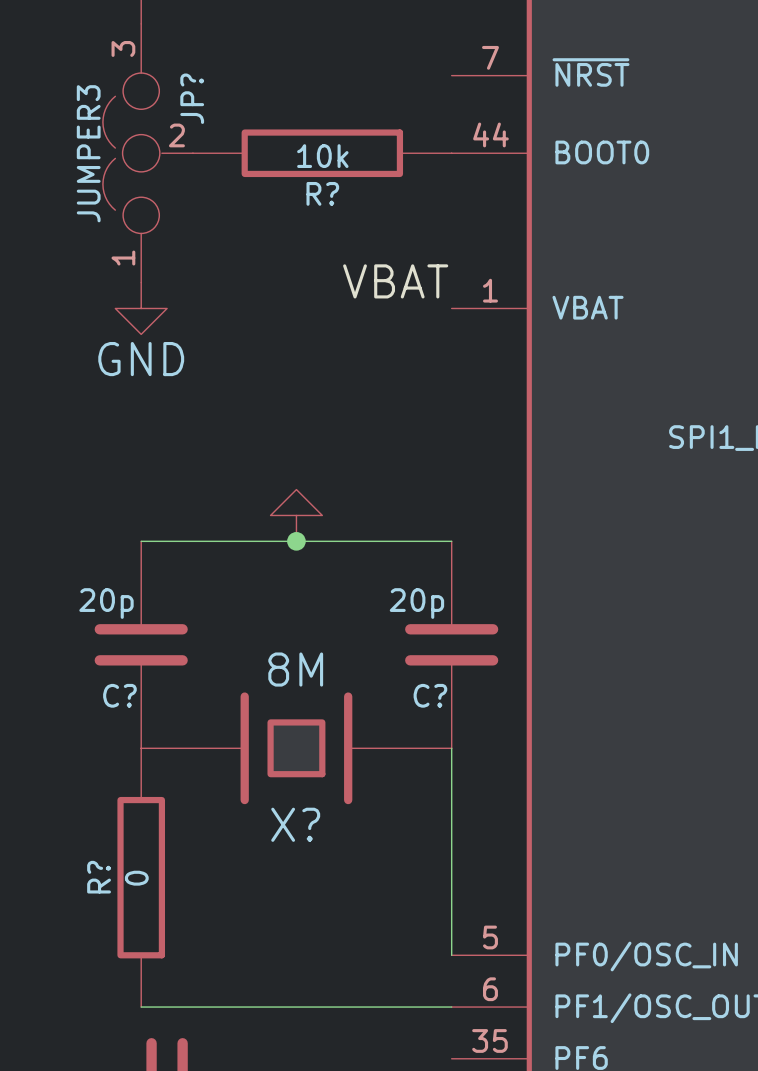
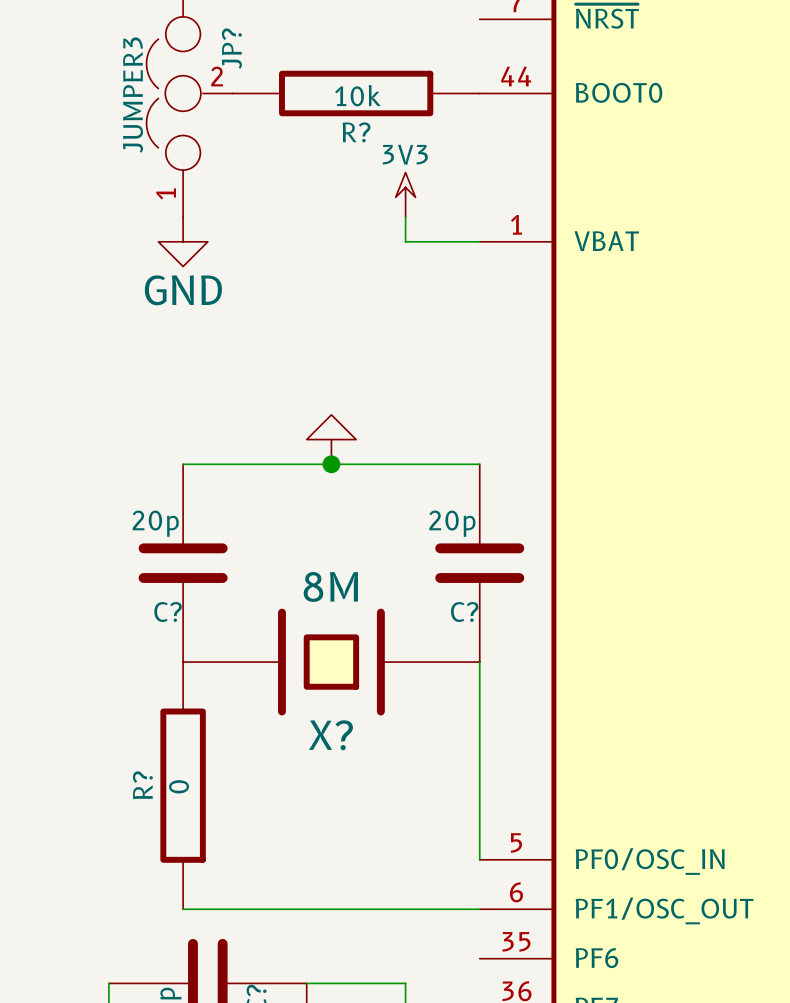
power symbol: none -> 3V3 (405, 194)
label: VBAT (395, 281) -> none
wire: none -> (405, 217) (405, 241) (479, 241)

